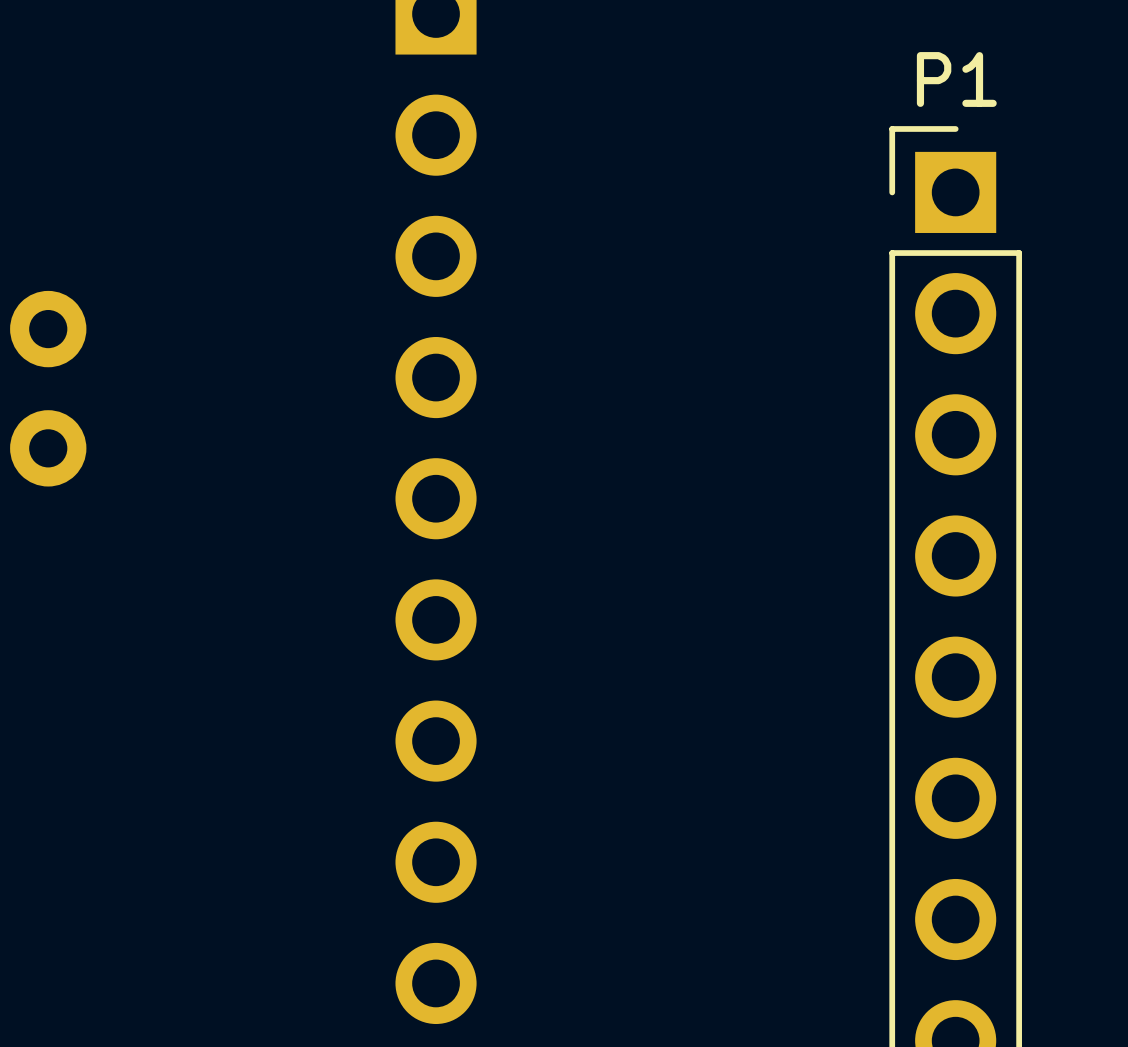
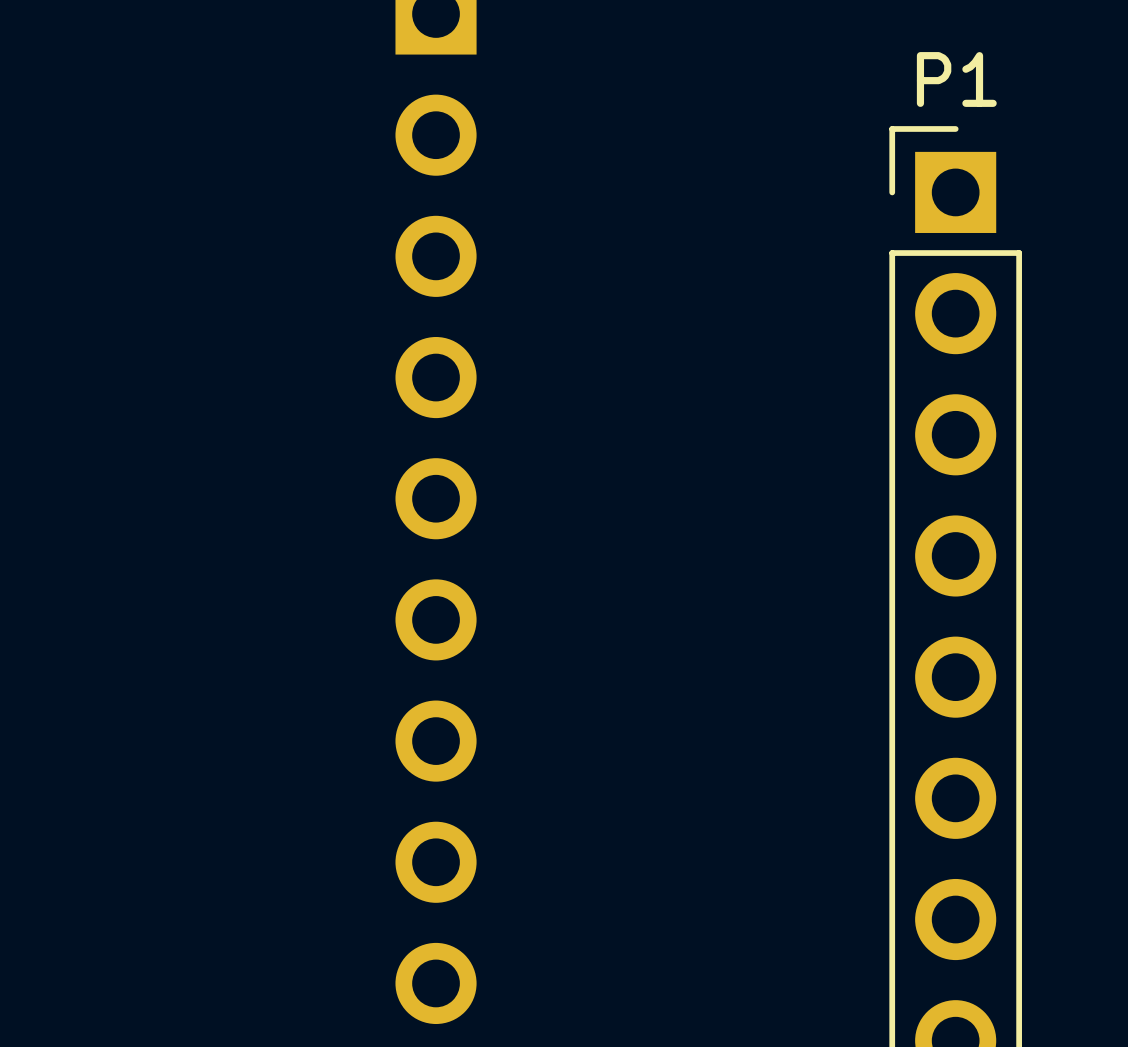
part: (48, 388) -> none

